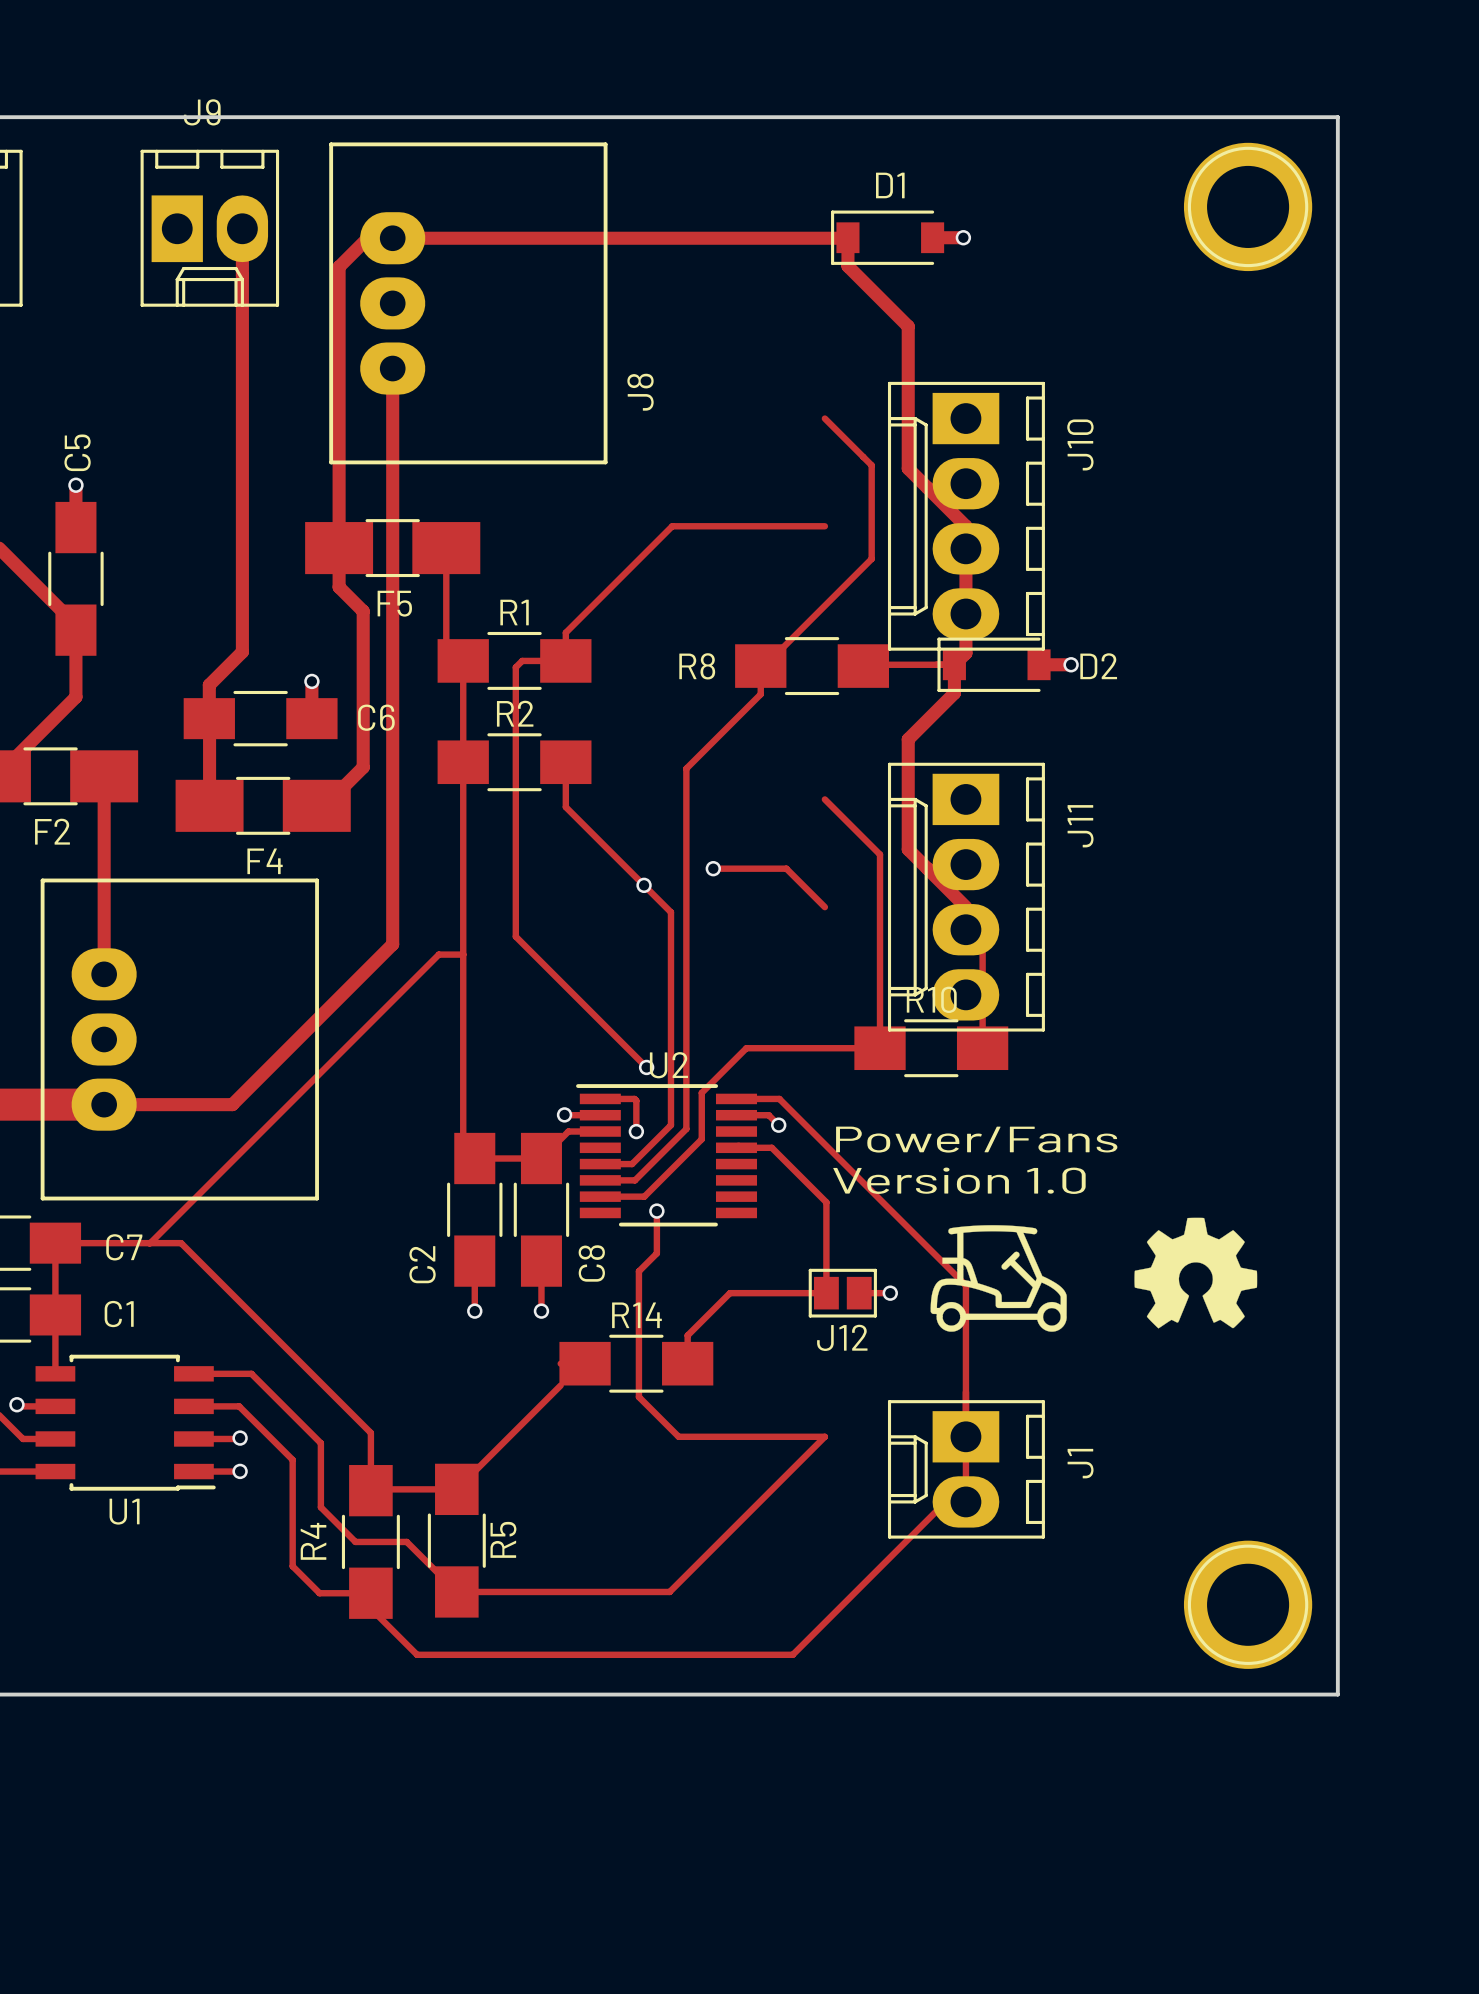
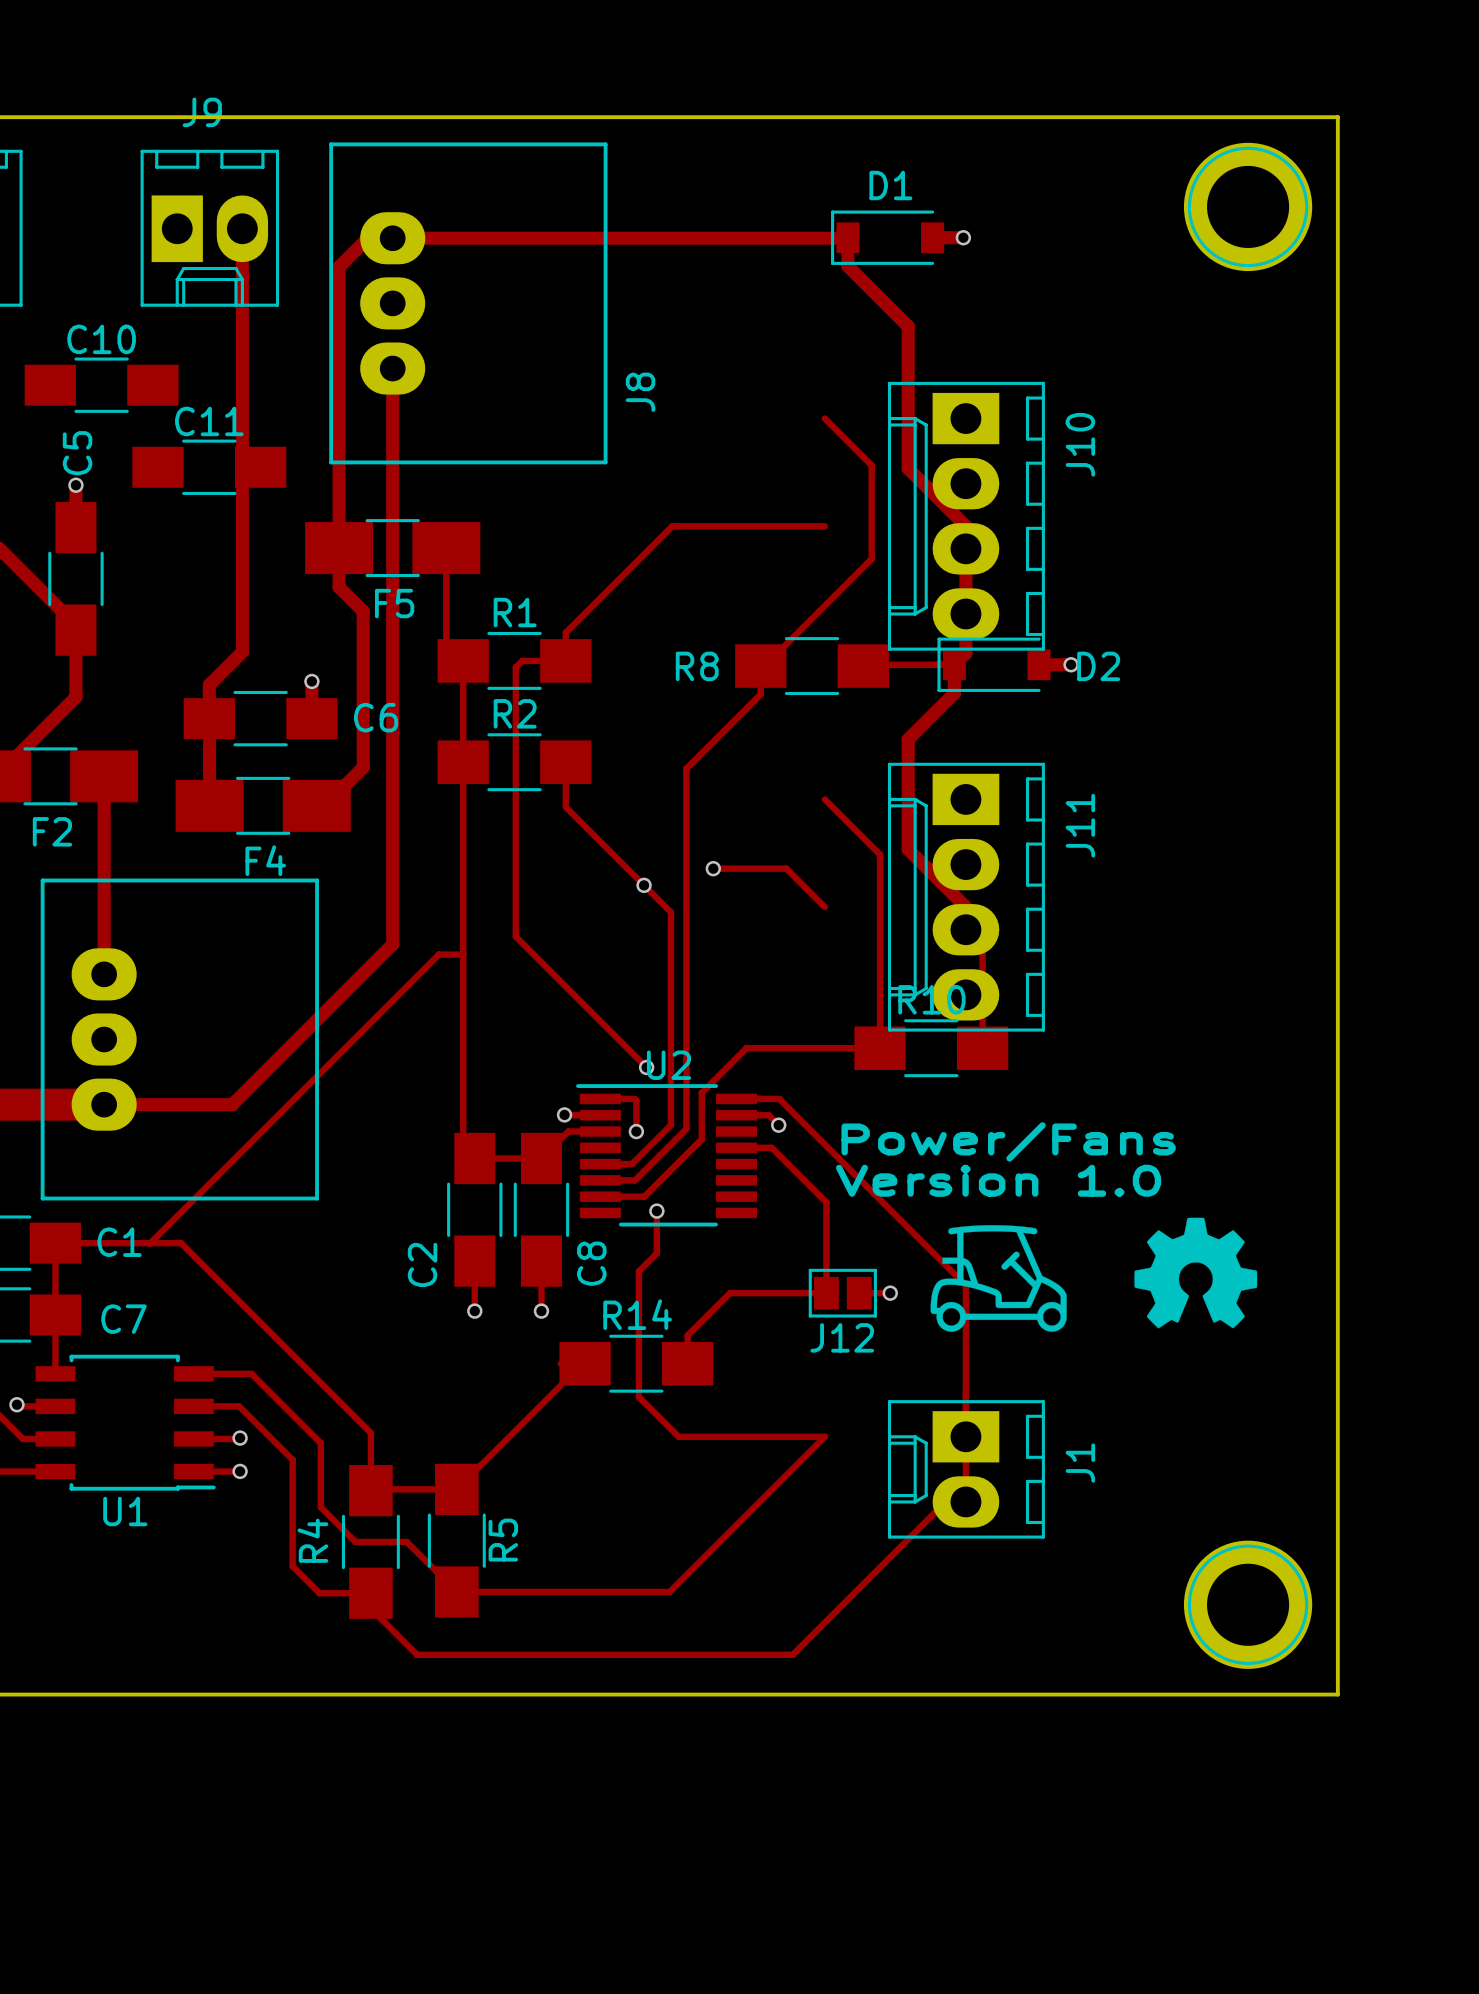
C10: none -> (101, 385)
C11: none -> (209, 467)
C7 name: C7 (124, 1247) -> C1 (119, 1242)
C1 name: C1 (119, 1314) -> C7 (124, 1319)

